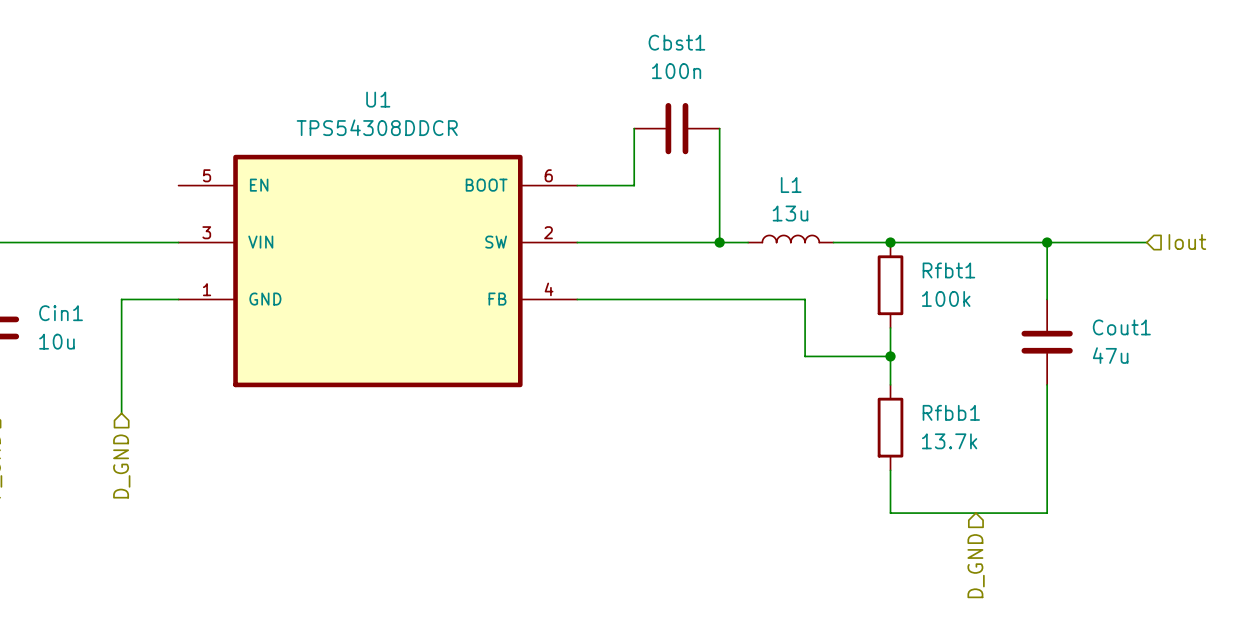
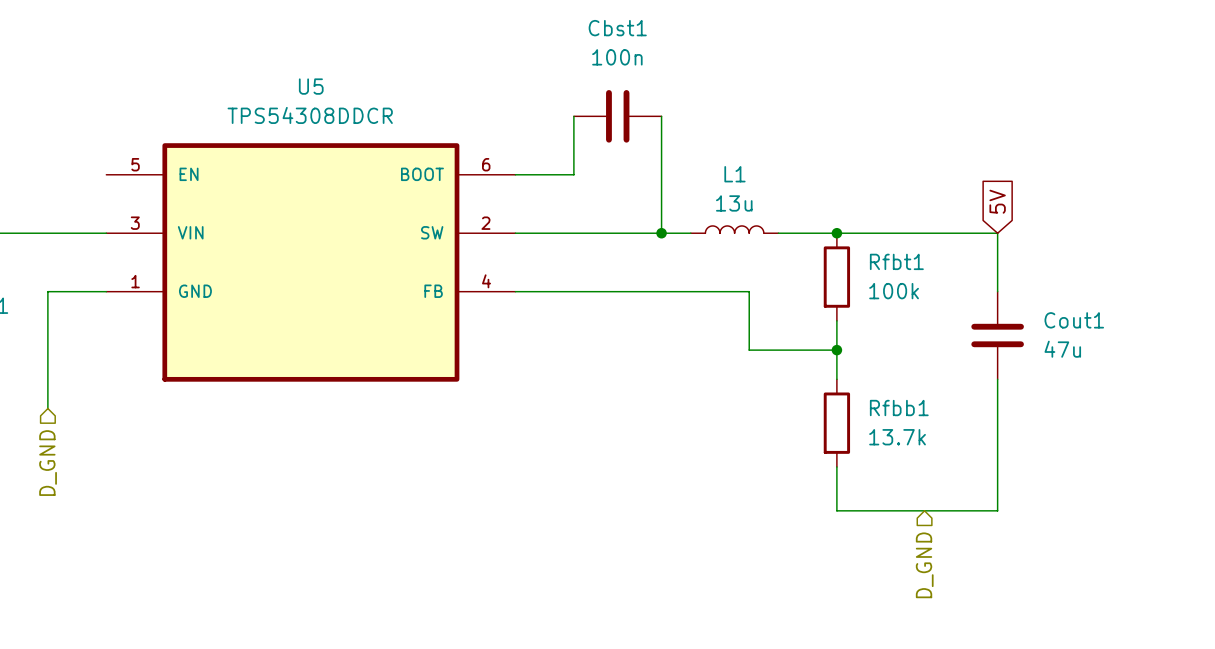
U1 name: U1 (378, 99) -> U5 (311, 86)
global label: none -> 5V (997, 201)
wire: (1047, 242) (1146, 242) -> none
junction: (1047, 242) -> none
hierarchical label: Iout (1187, 242) -> none

